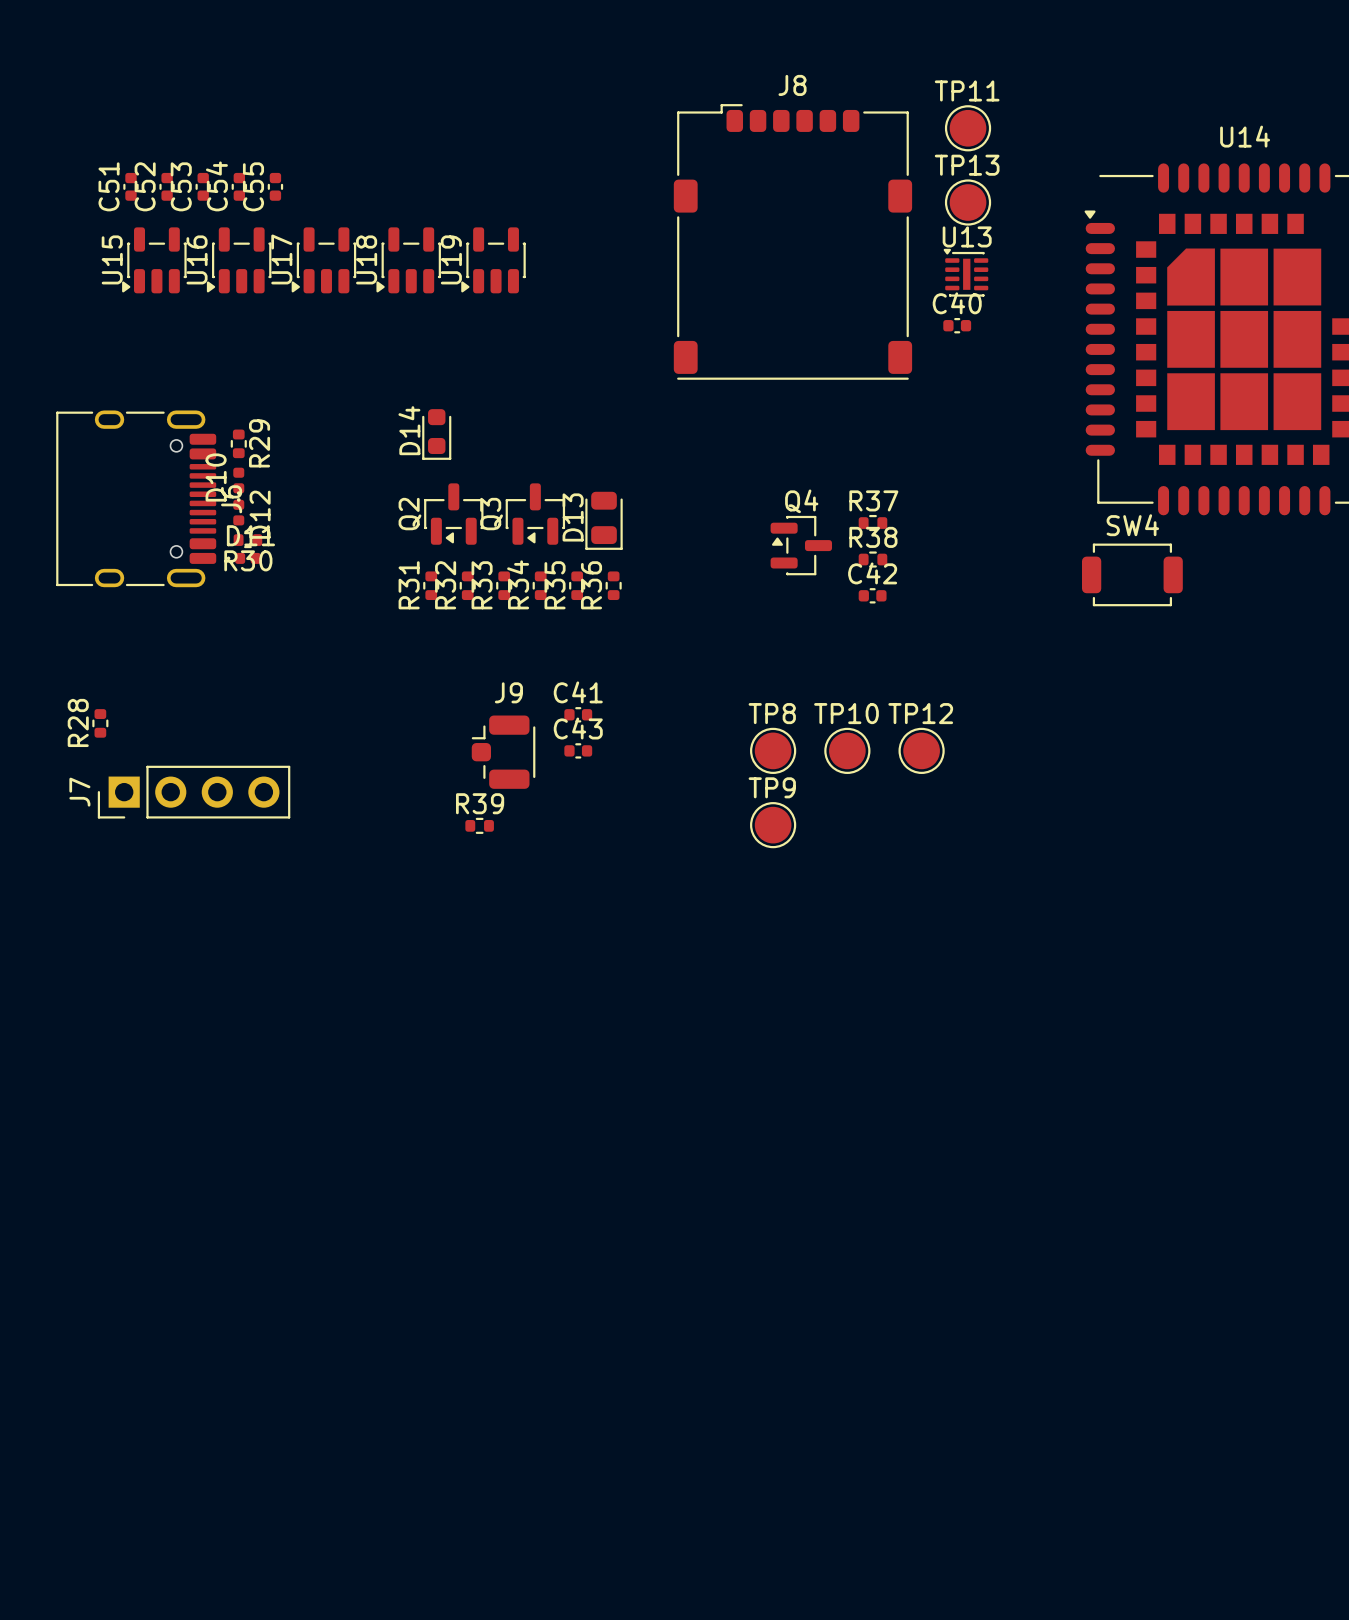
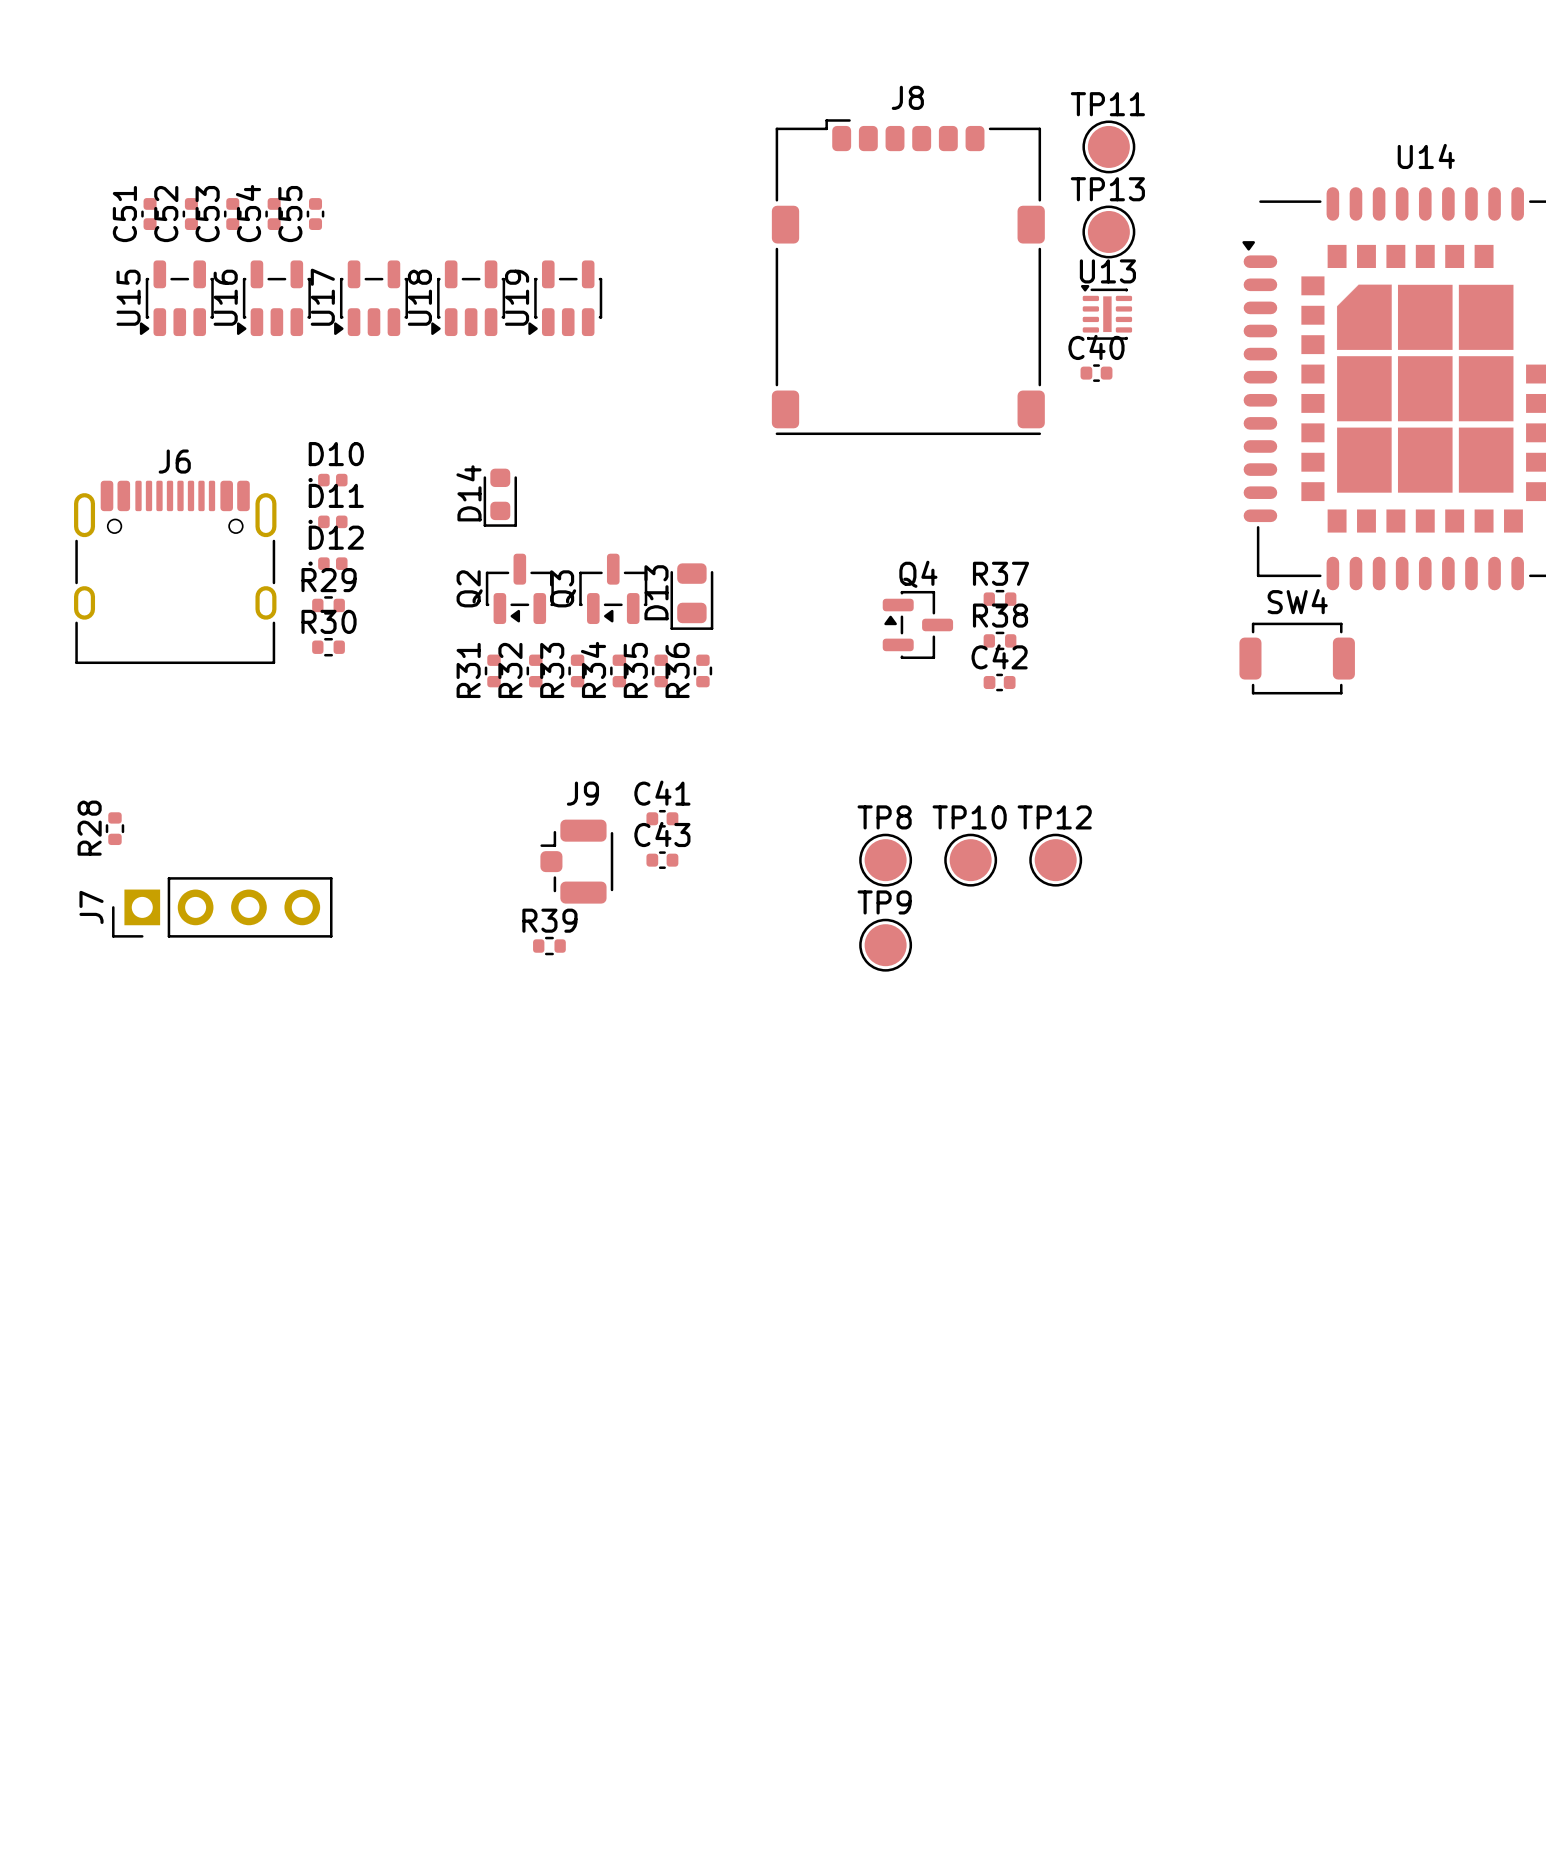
R29 rotation: 0° (238, 443) -> 90° clockwise (328, 605)
R29 position: (238, 443) -> (328, 605)
D10 rotation: 0° (238, 484) -> 90° clockwise (328, 480)
D10 position: (238, 484) -> (328, 480)
J6 rotation: 0° (136, 498) -> 90° counterclockwise (175, 572)
D12 rotation: 0° (238, 508) -> 90° counterclockwise (328, 563)
D12 position: (238, 508) -> (328, 563)
R30 position: (247, 540) -> (328, 647)
D11 position: (243, 558) -> (328, 521)
R30 name position: R30 (248, 560) -> R30 (329, 621)

